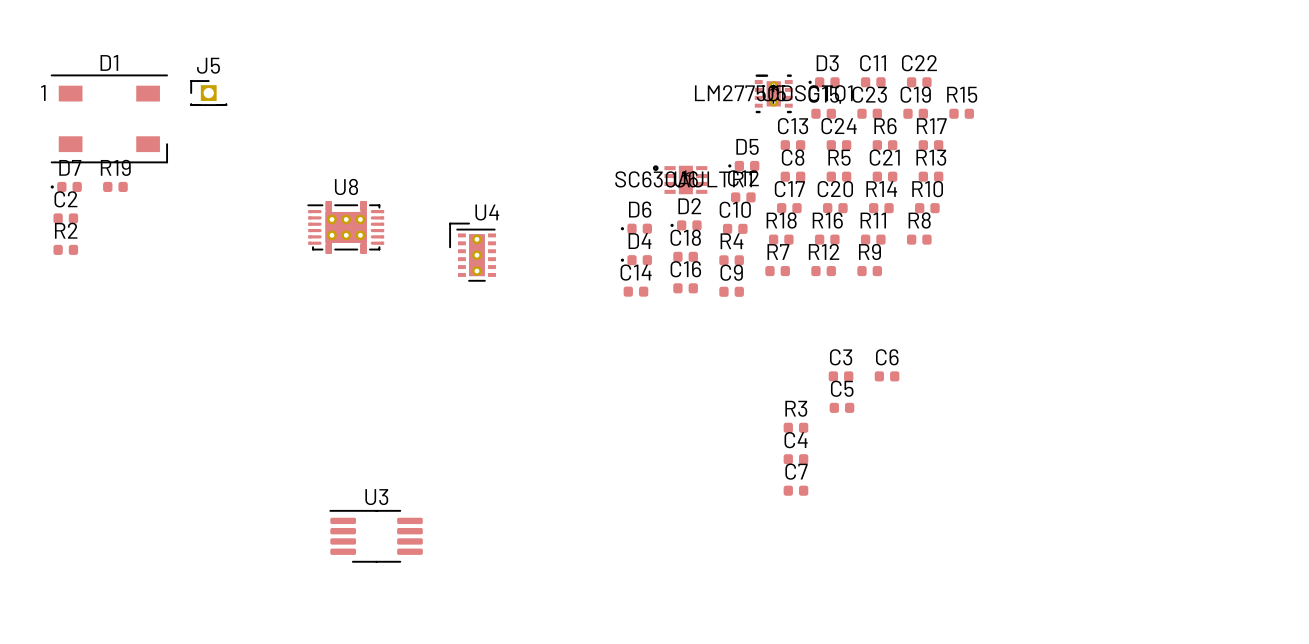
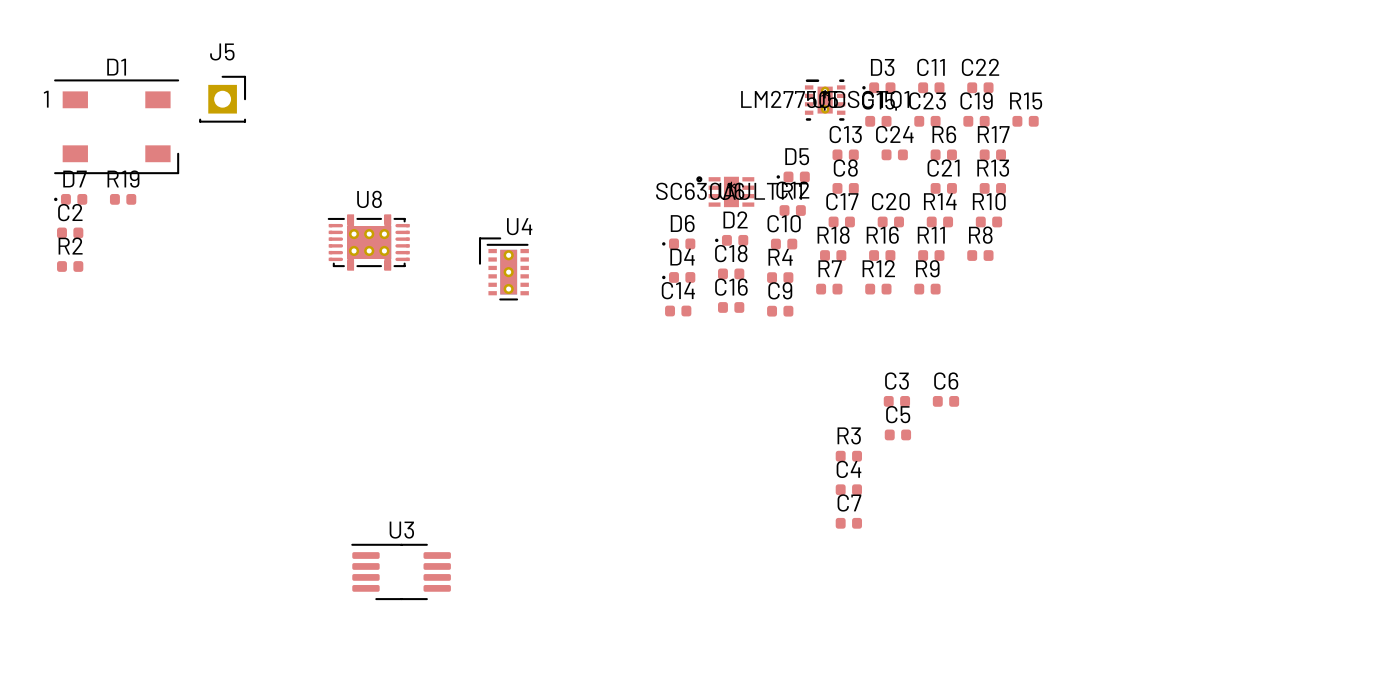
J5 footprint: [190, 80, 228, 107] -> [199, 75, 247, 123]
R5: (838, 176) -> none

